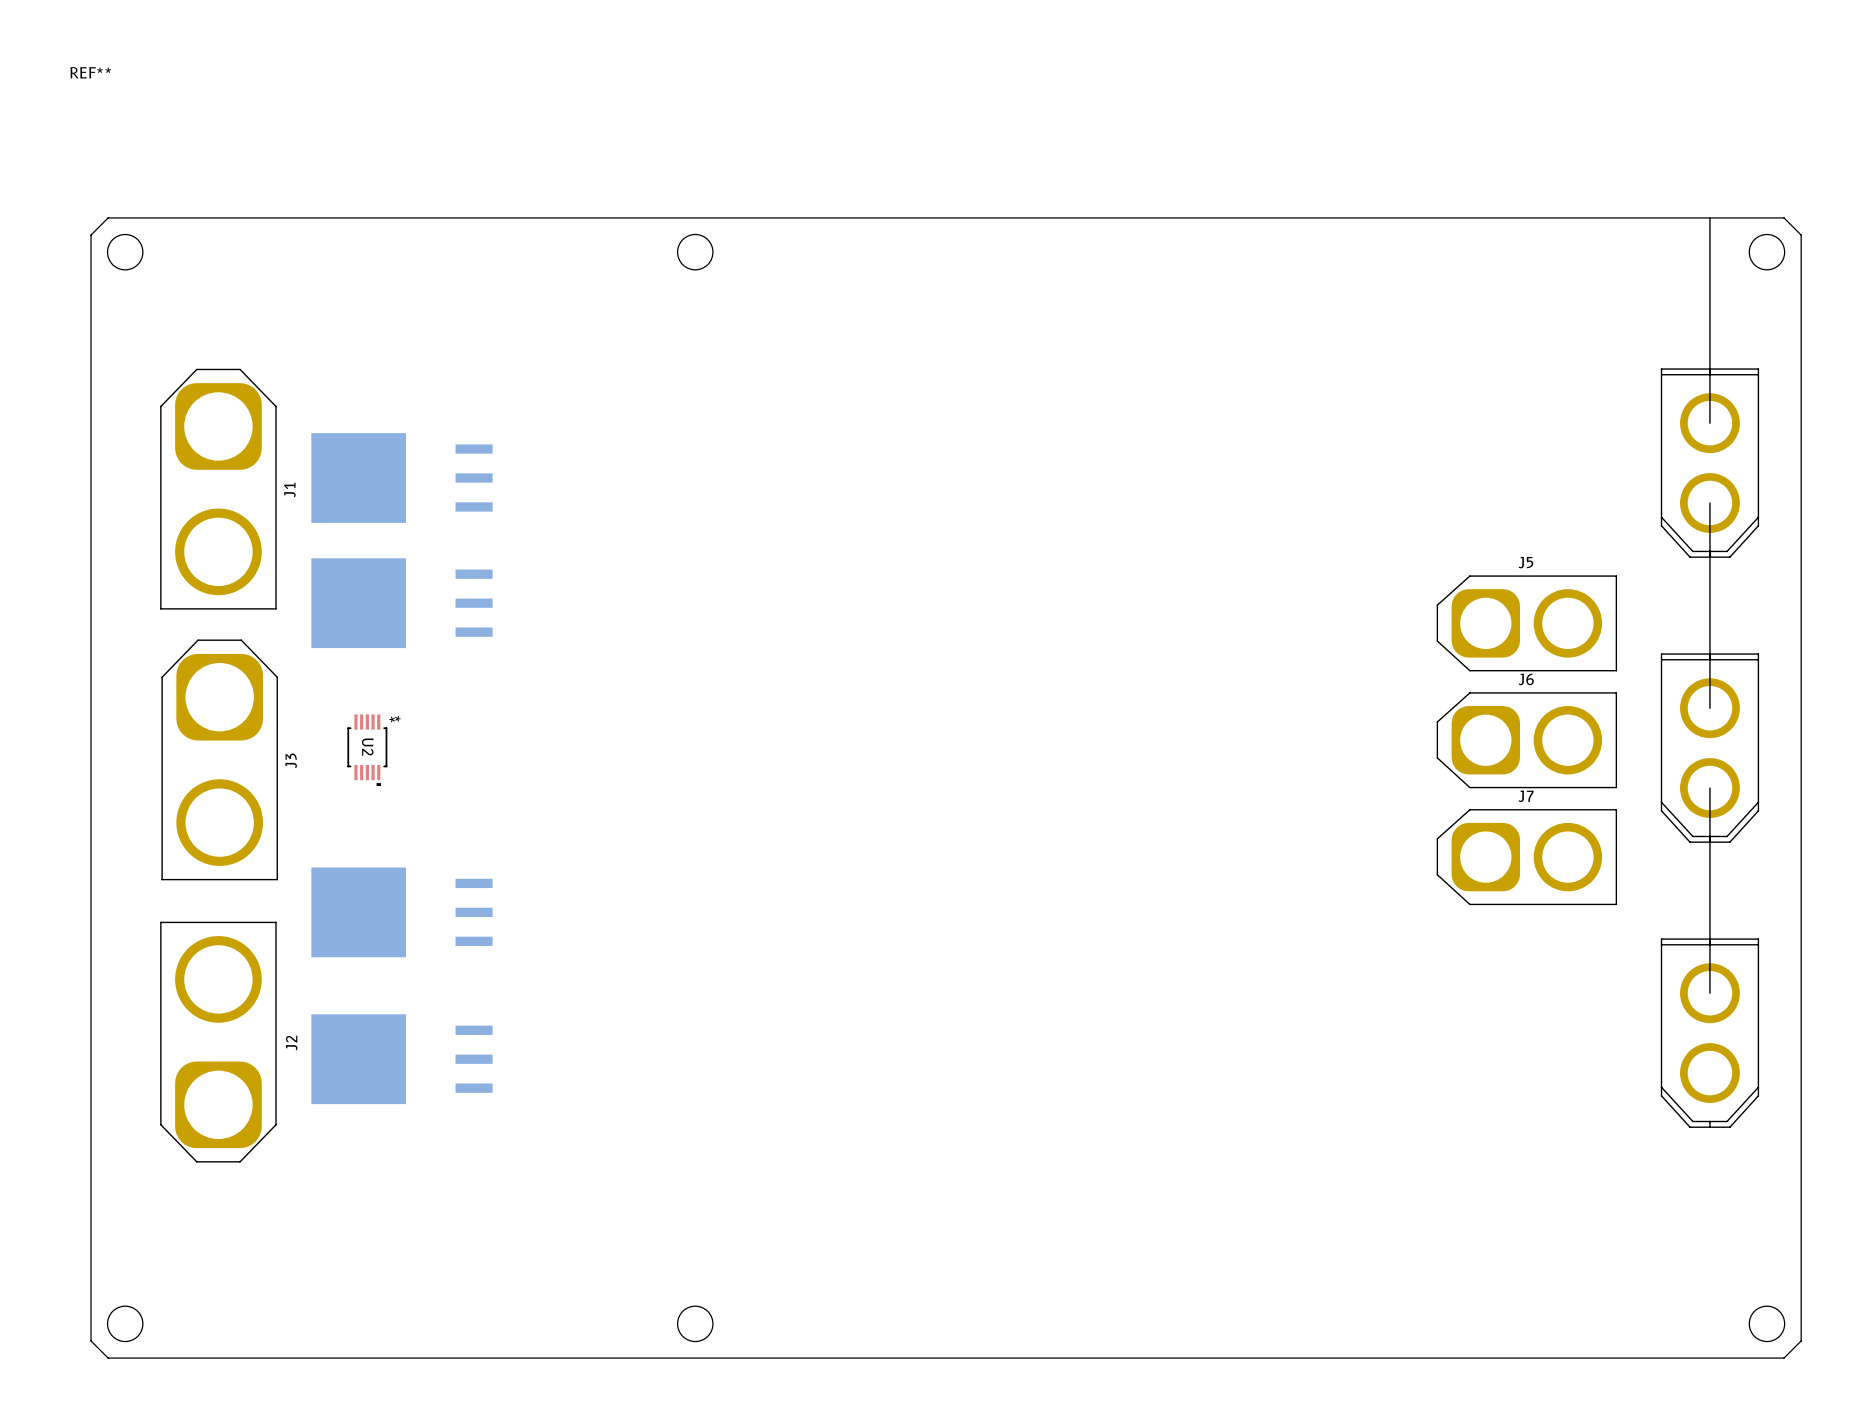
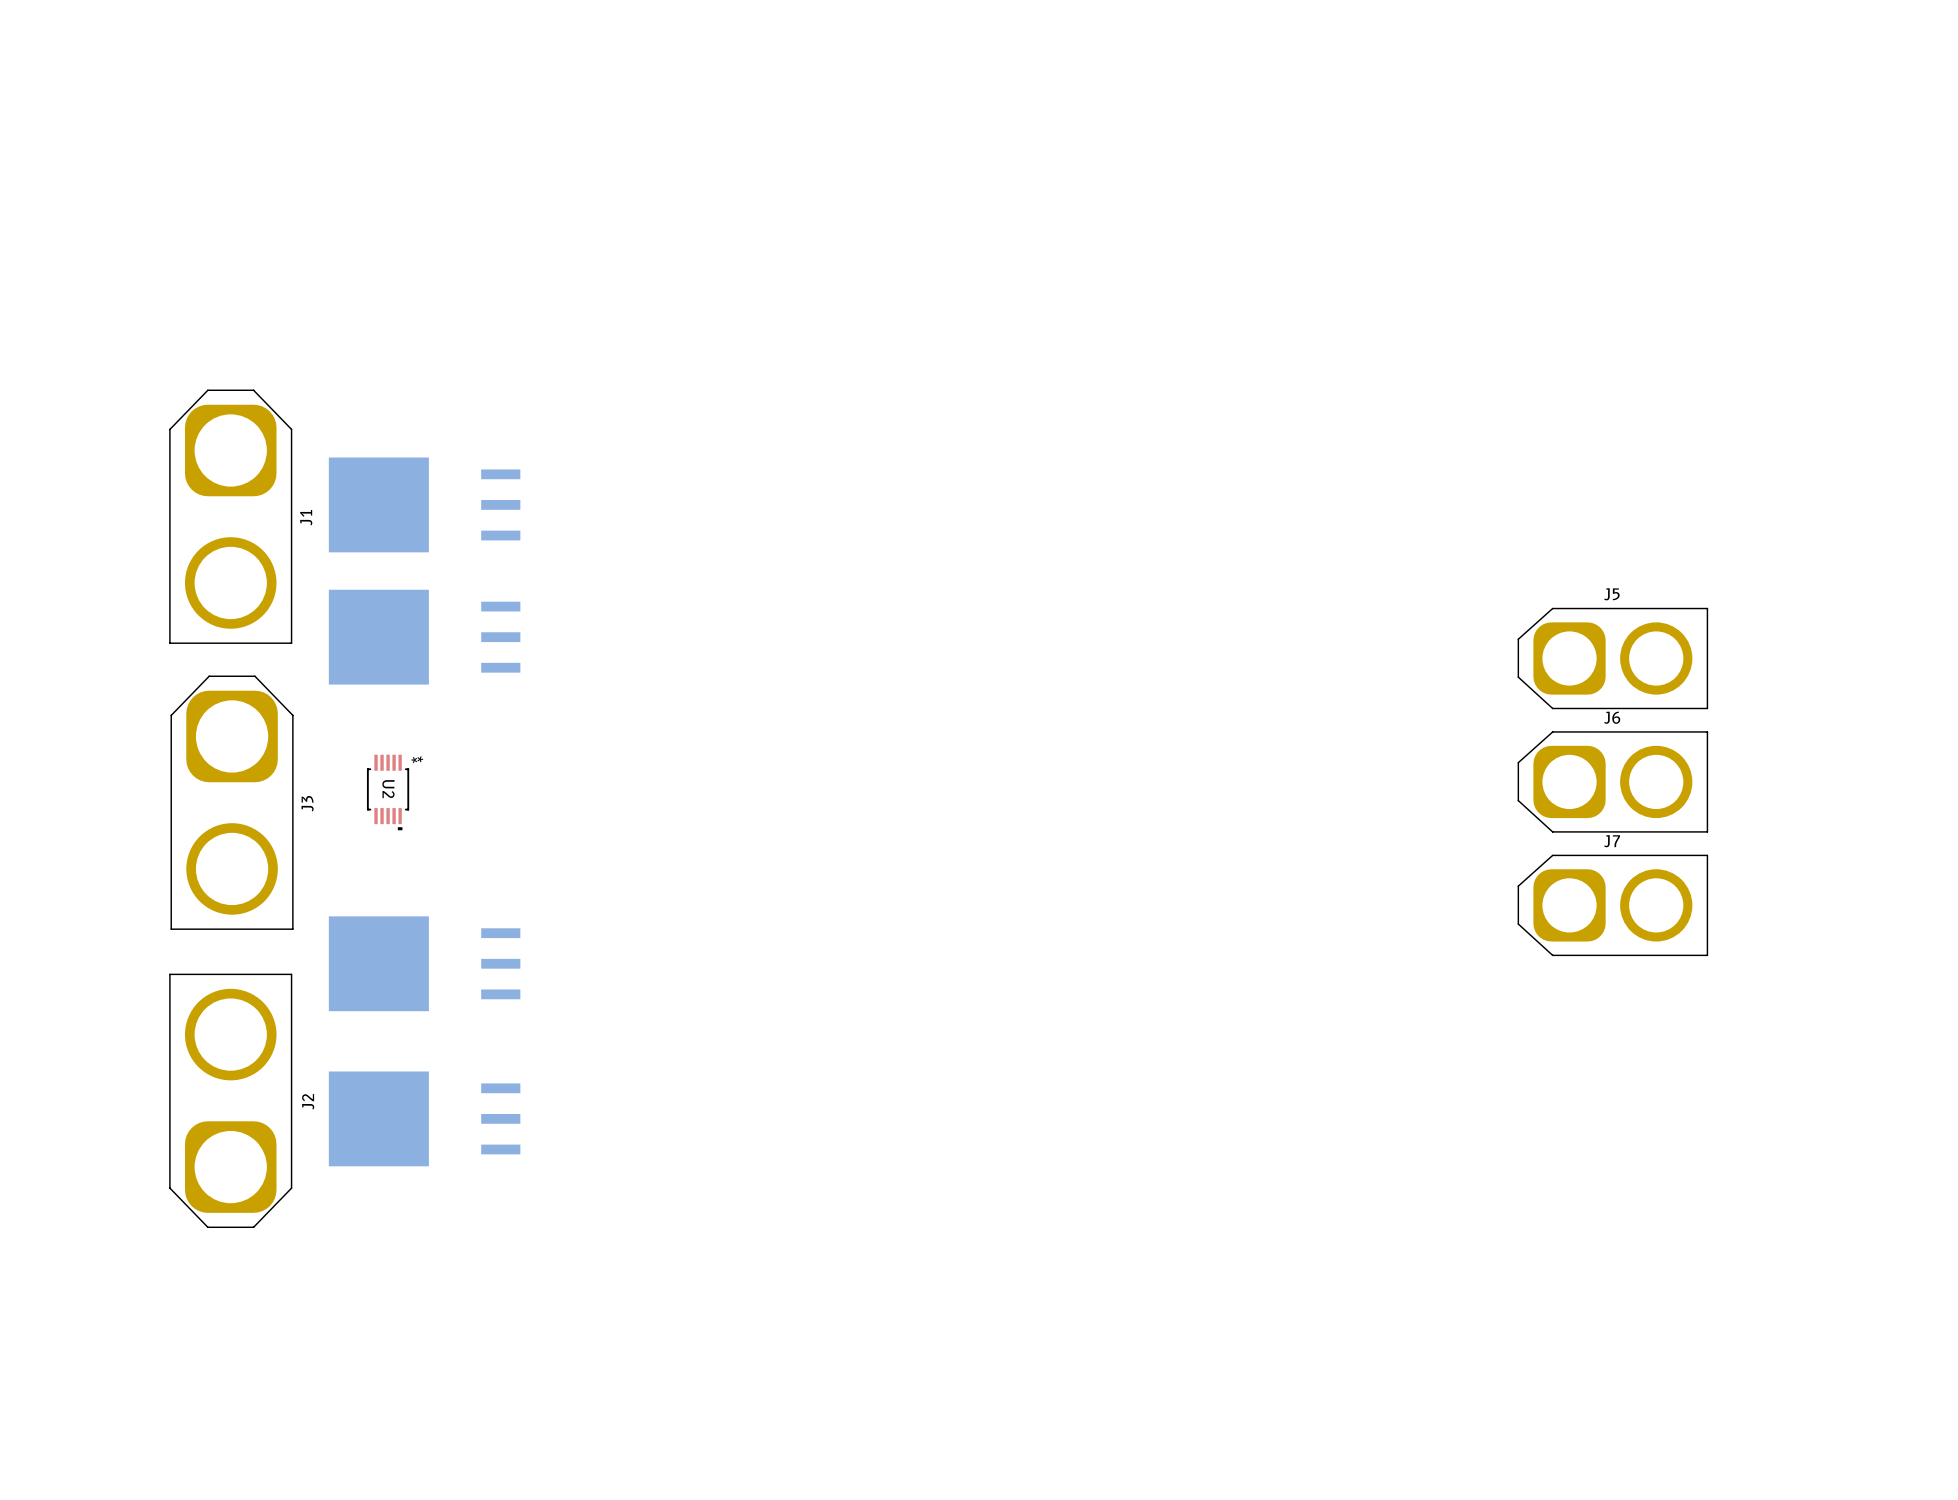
REF**: (946, 787) -> none

